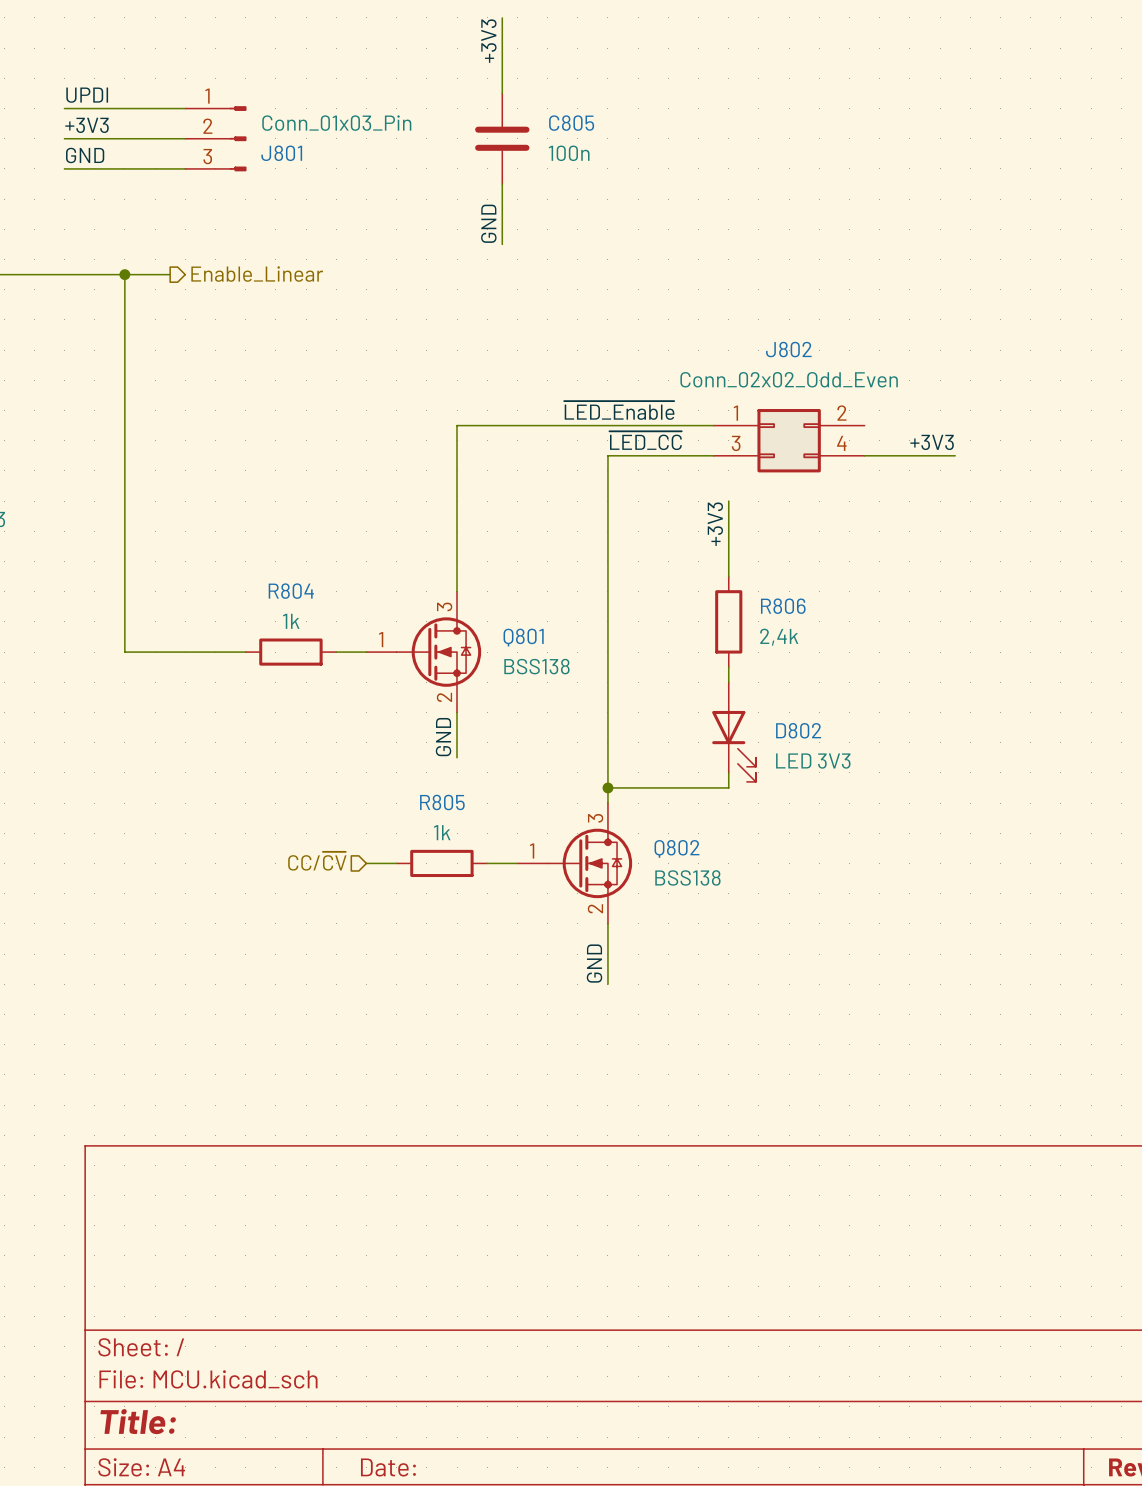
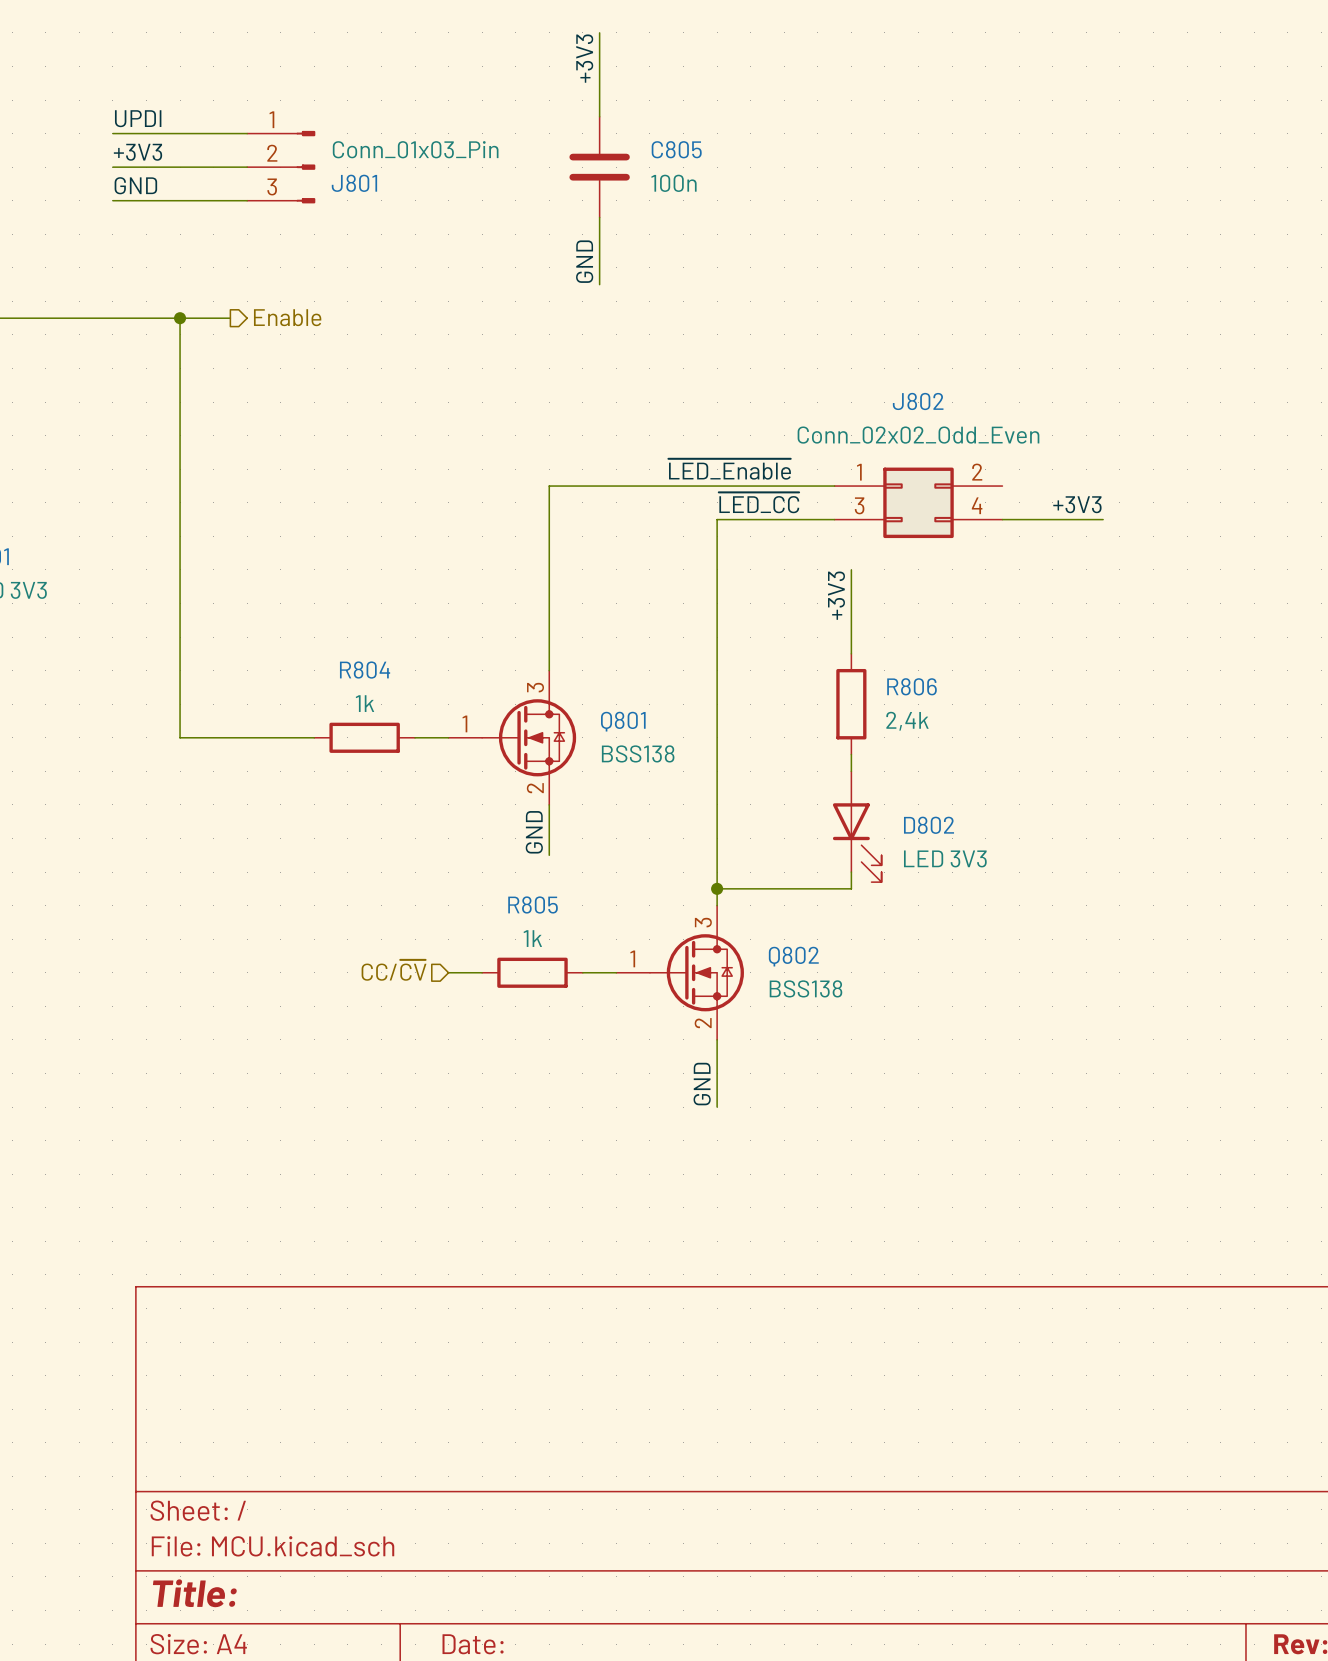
hierarchical label: Enable_Linear (257, 274) -> Enable (287, 317)

